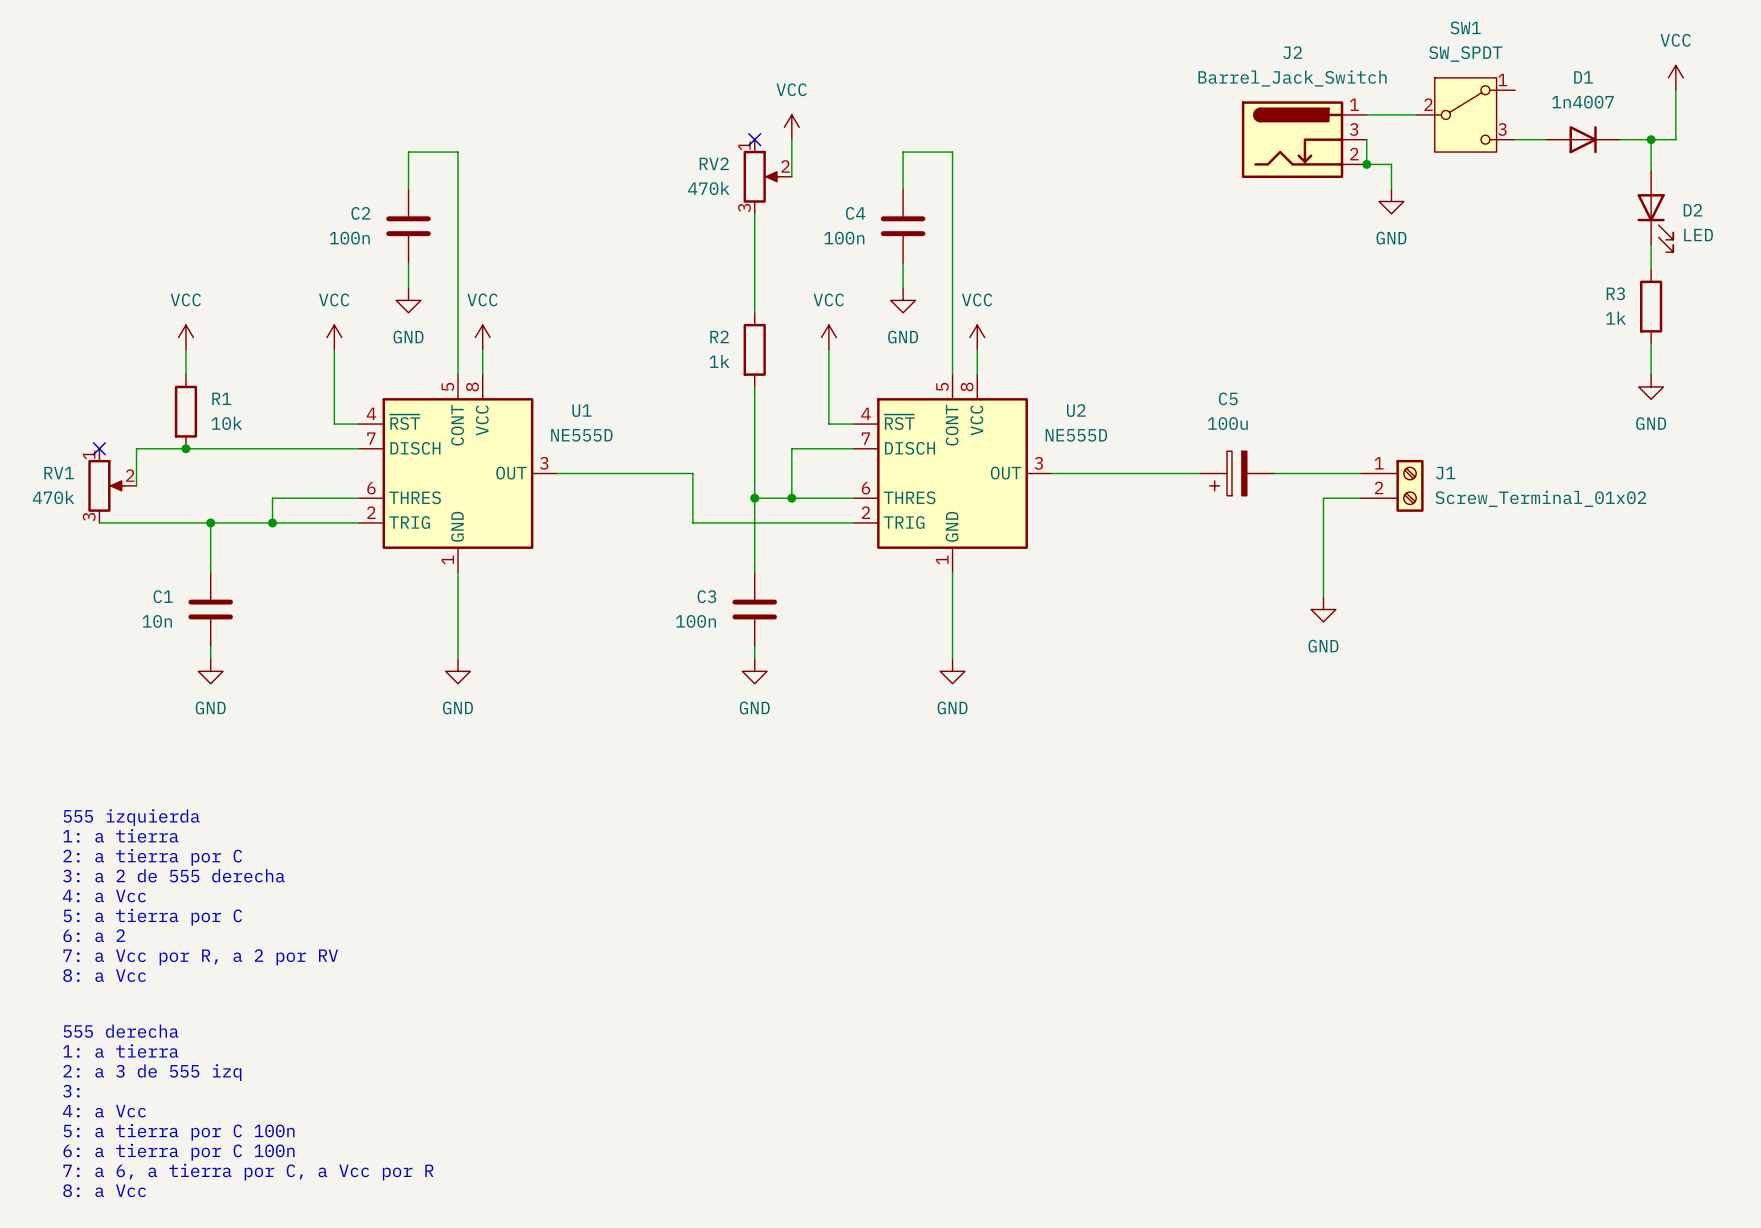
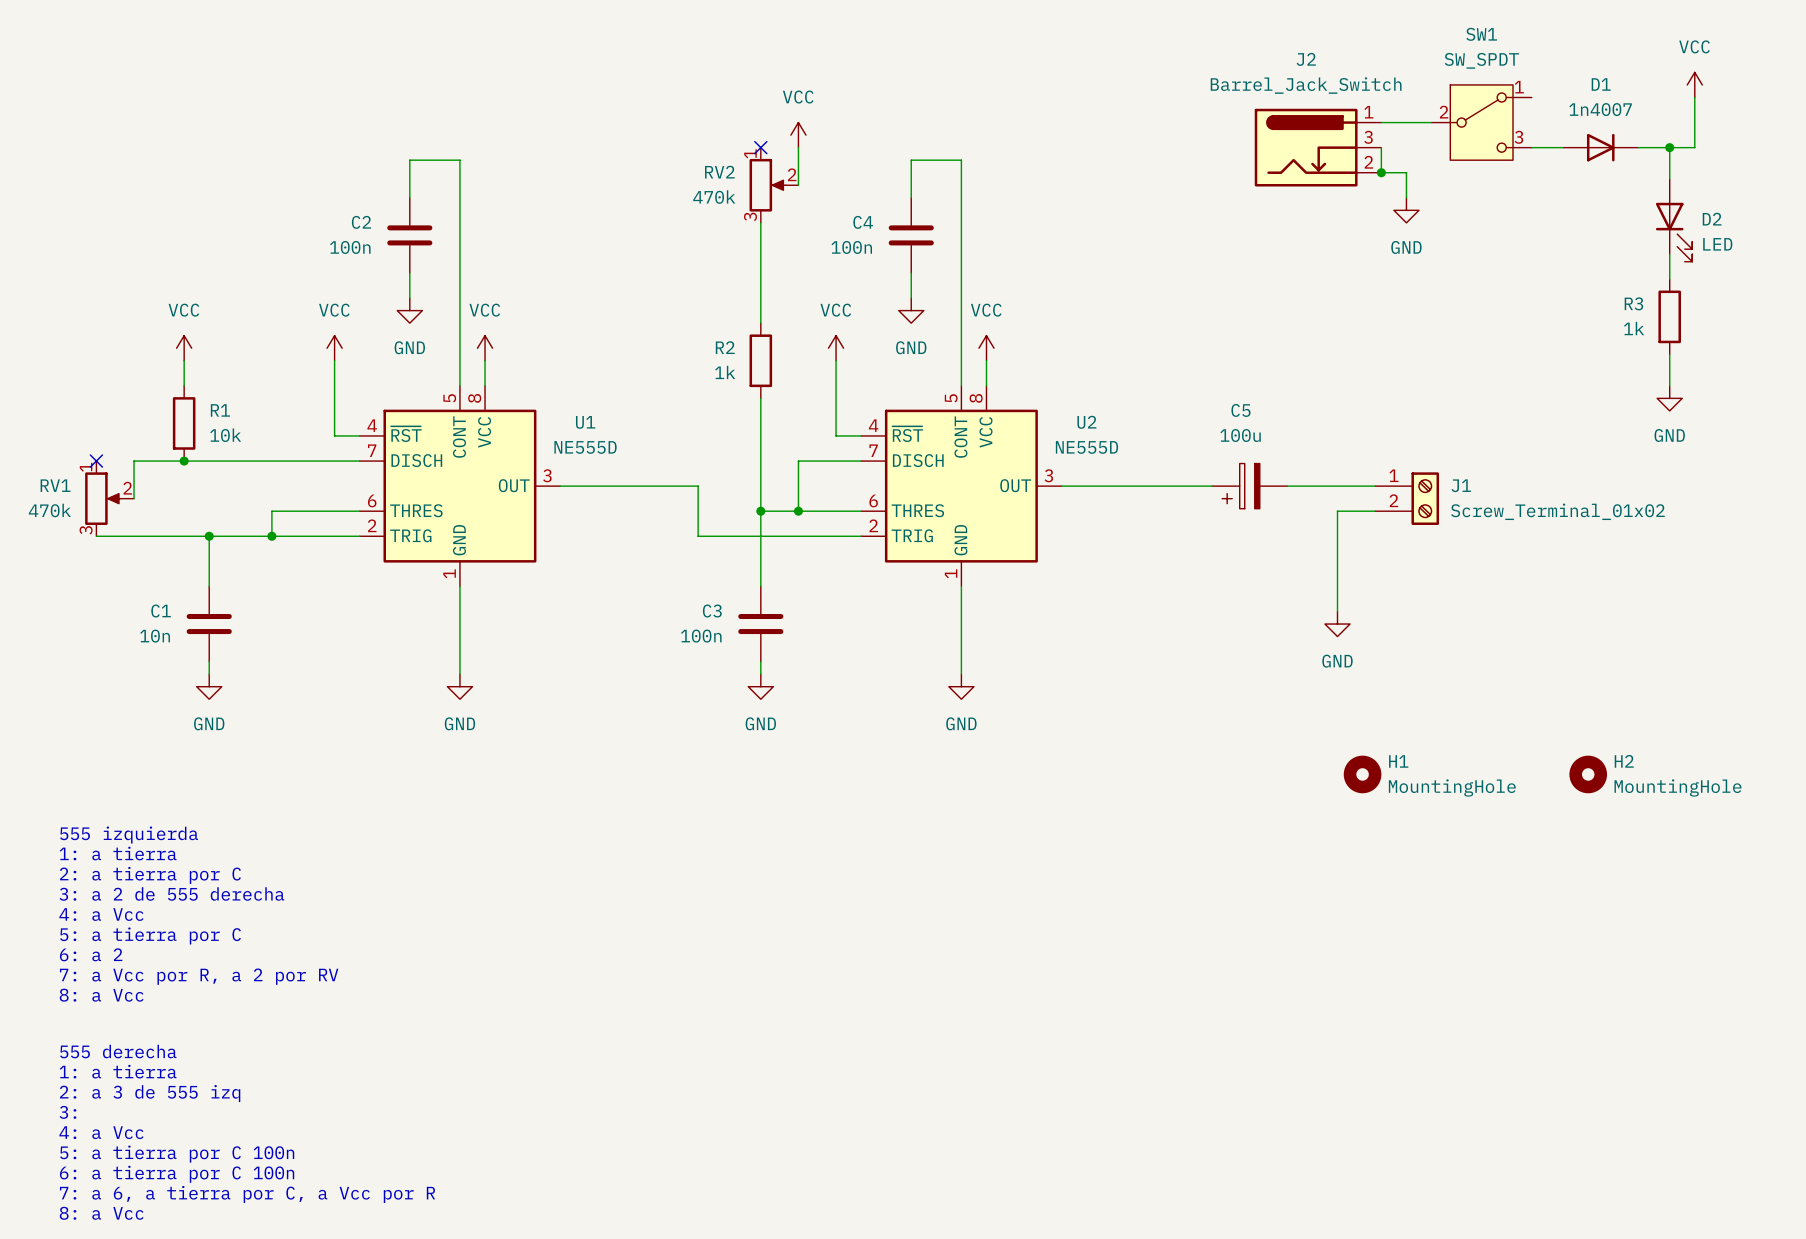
H1: none -> MountingHole (1362, 774)
H2: none -> MountingHole (1588, 774)

